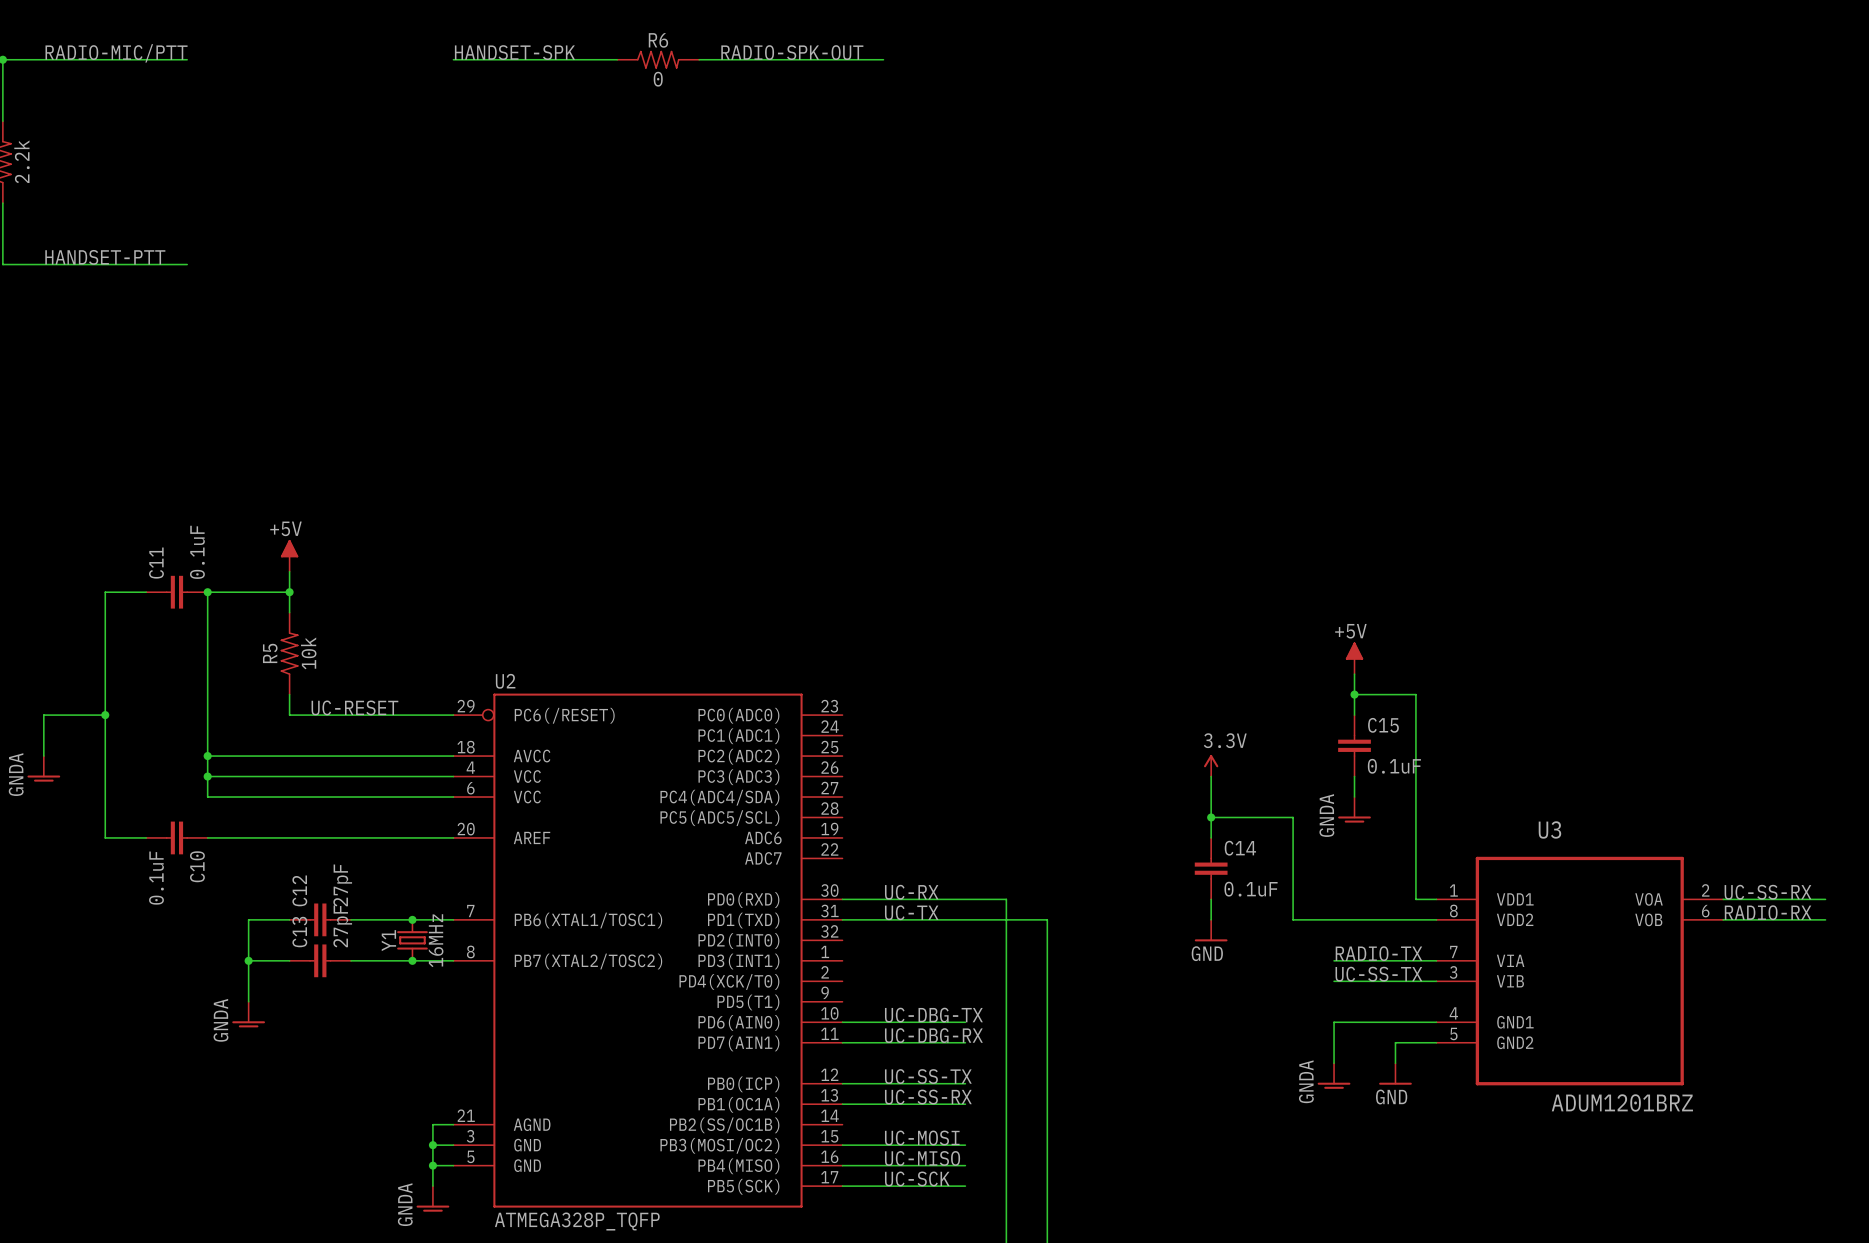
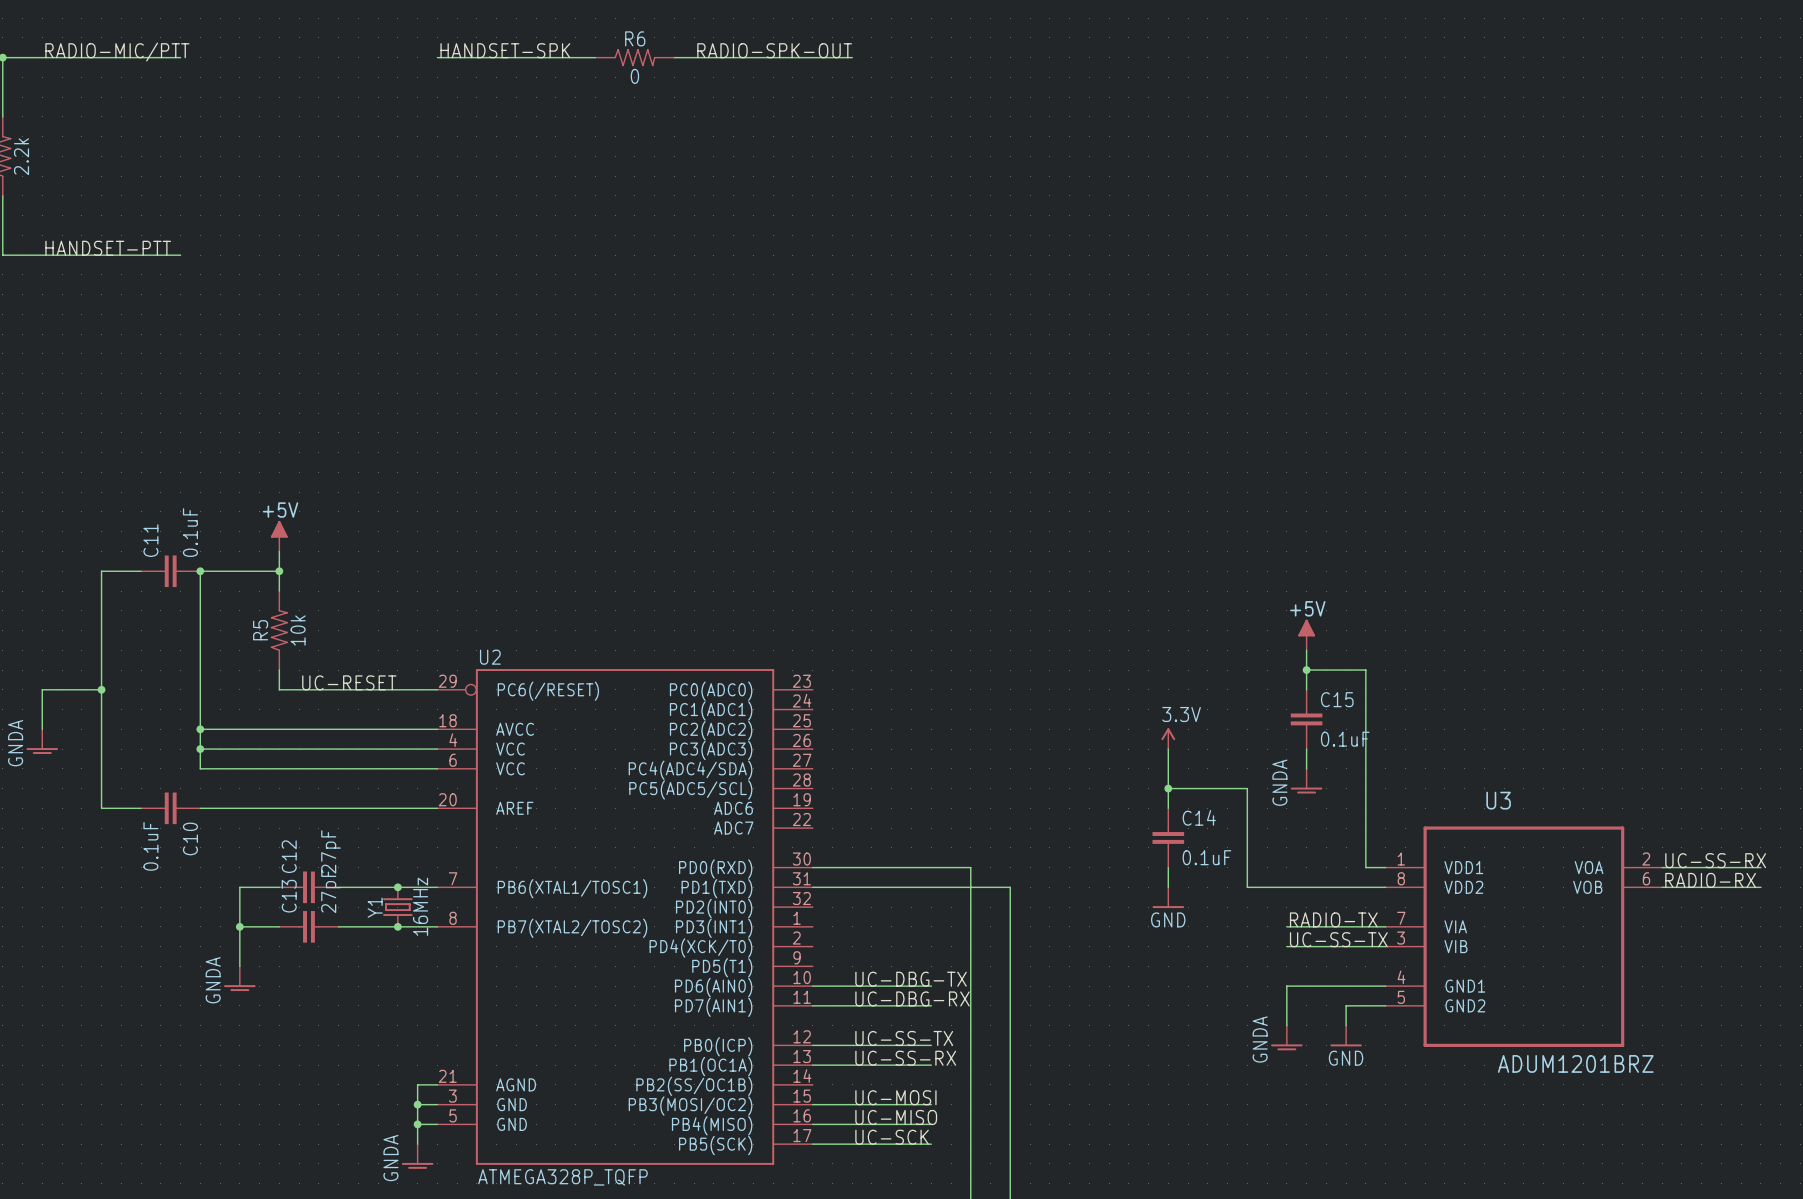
label: UC-RX (911, 892) -> none
label: UC-TX (911, 912) -> none

